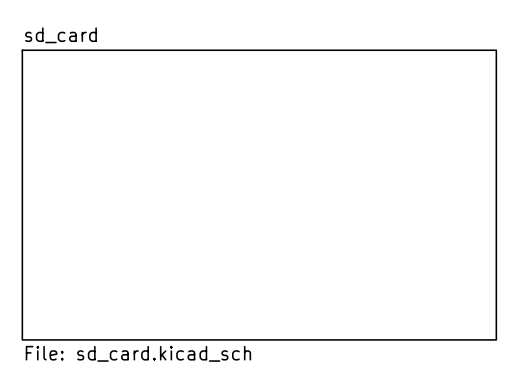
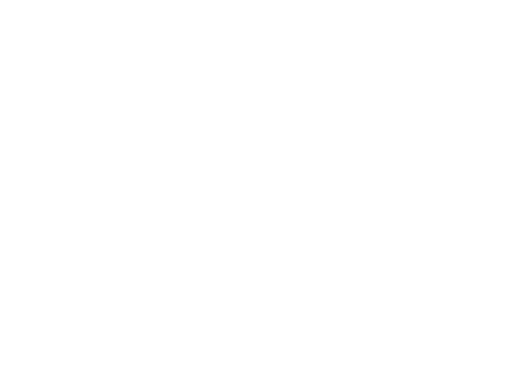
sheet sd_card: File: sd_card.kicad_sch (259, 195) -> none

